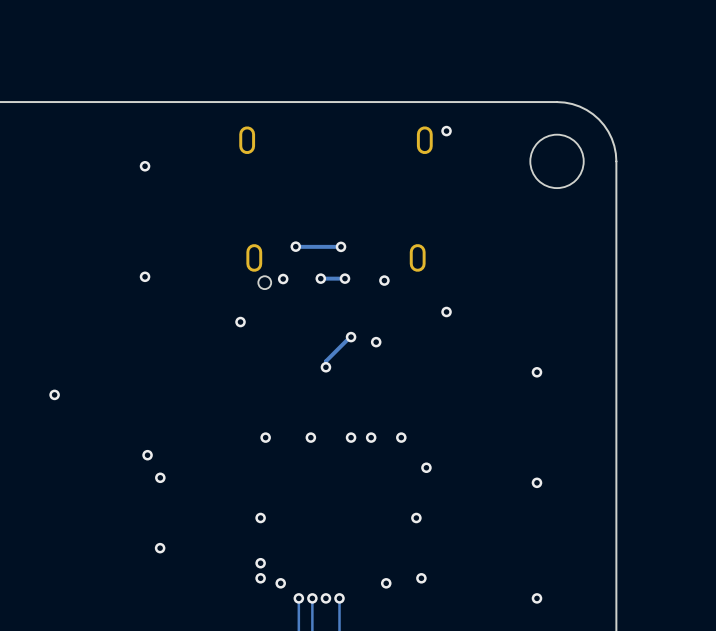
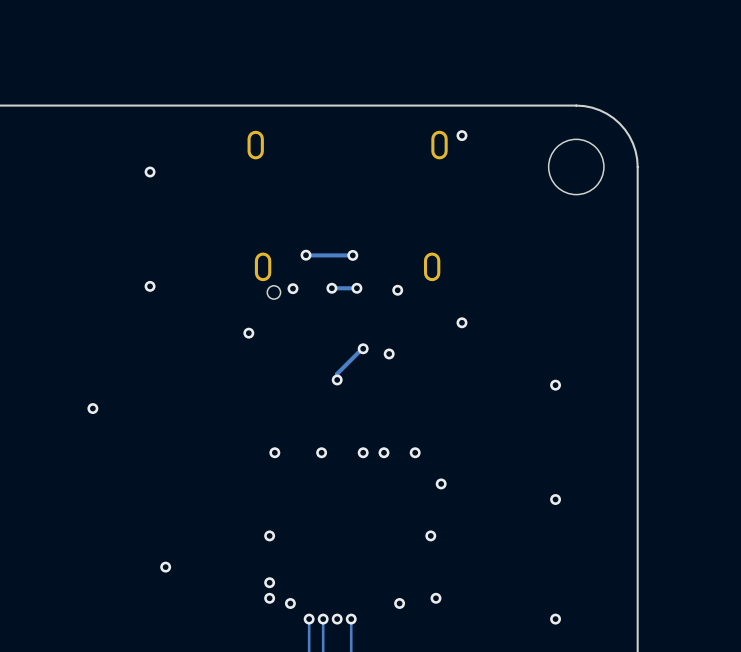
via position: (54, 394) -> (92, 408)
via: (147, 455) -> none
via: (160, 477) -> none

